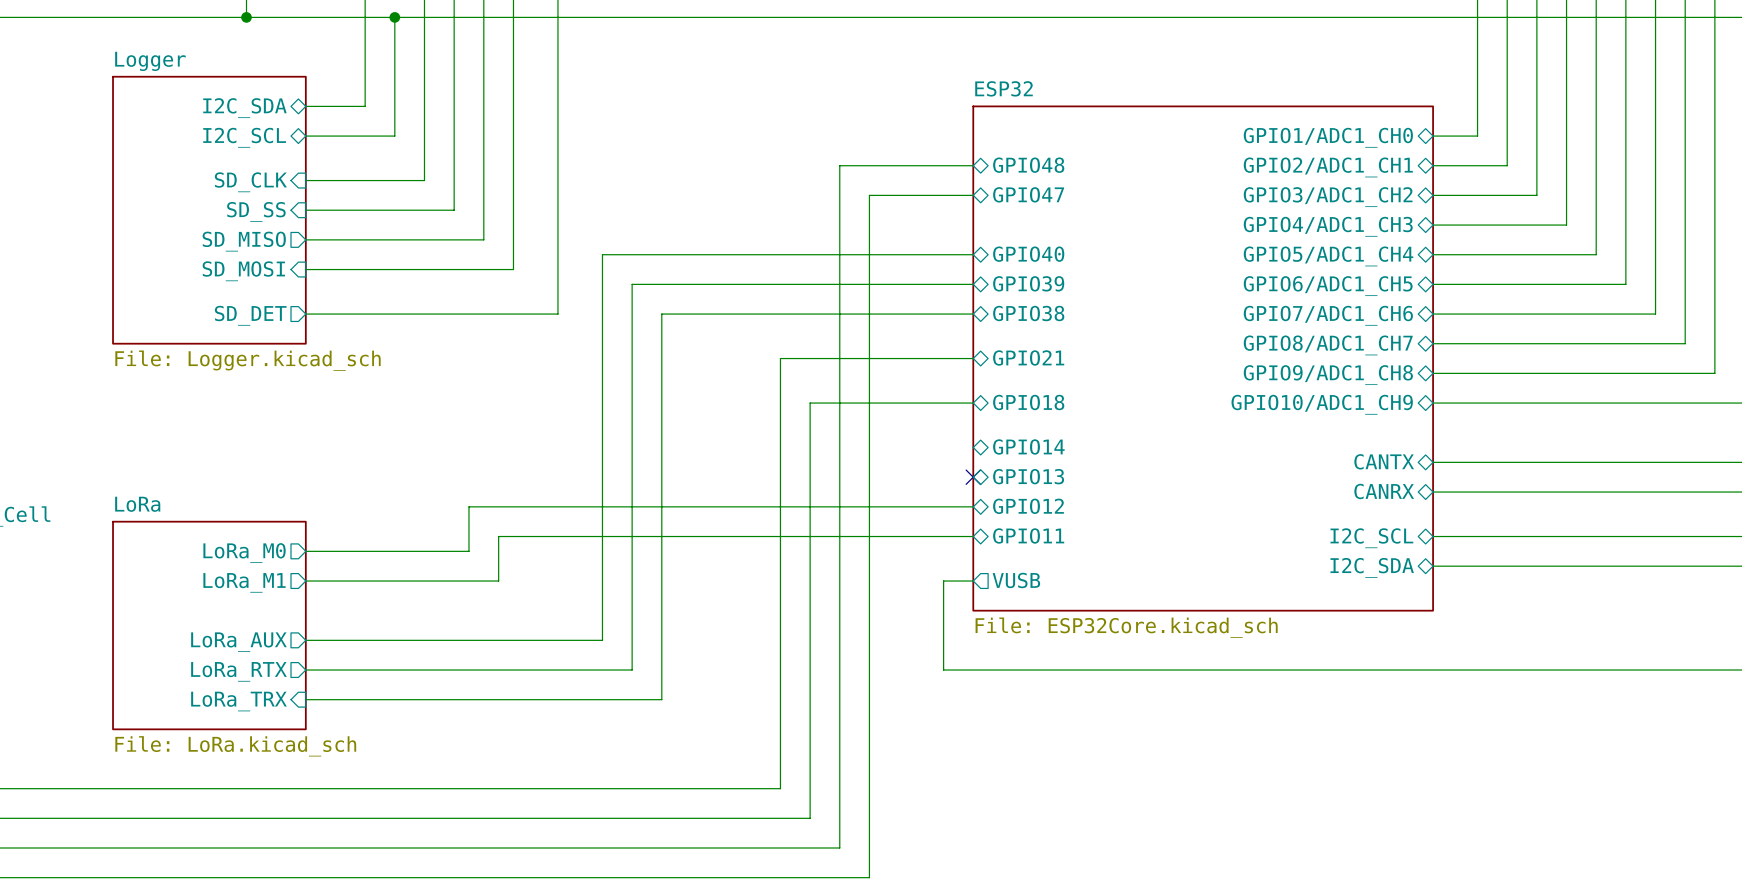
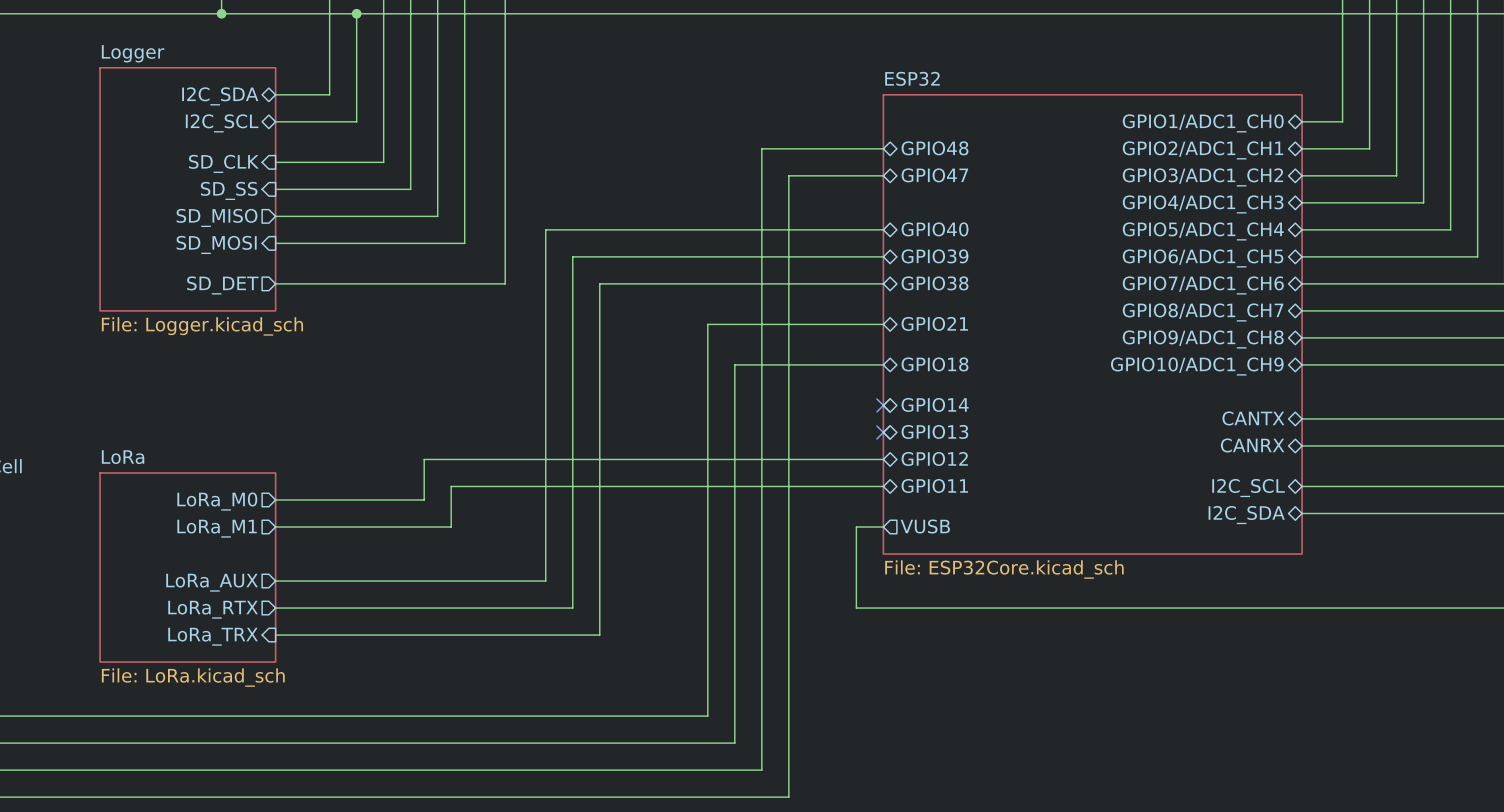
no-connect mark: none -> (883, 405)

